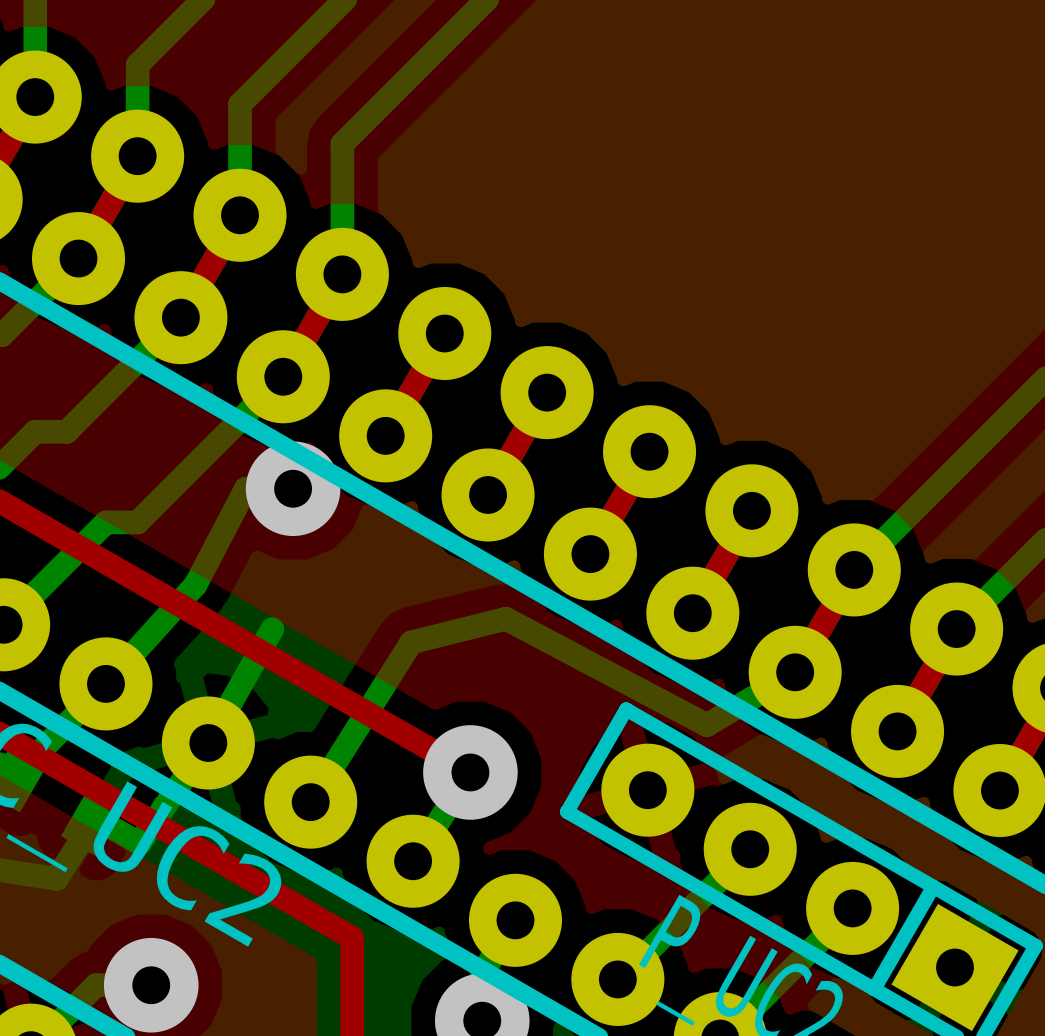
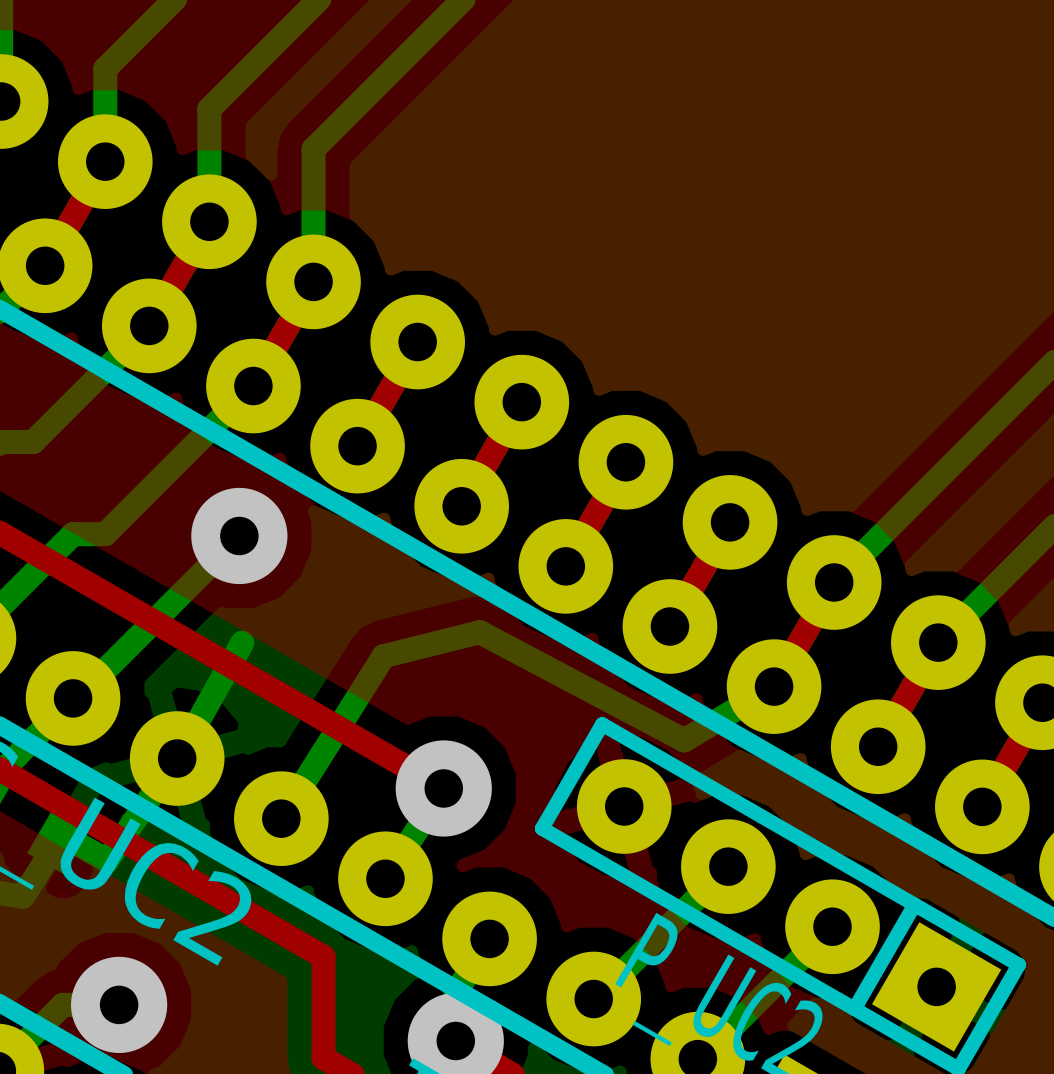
bottom track: (293, 488) (245, 488) (195, 584) (105, 683) -> (239, 535) (76, 698) (73, 698)
via position: (293, 488) -> (239, 535)

